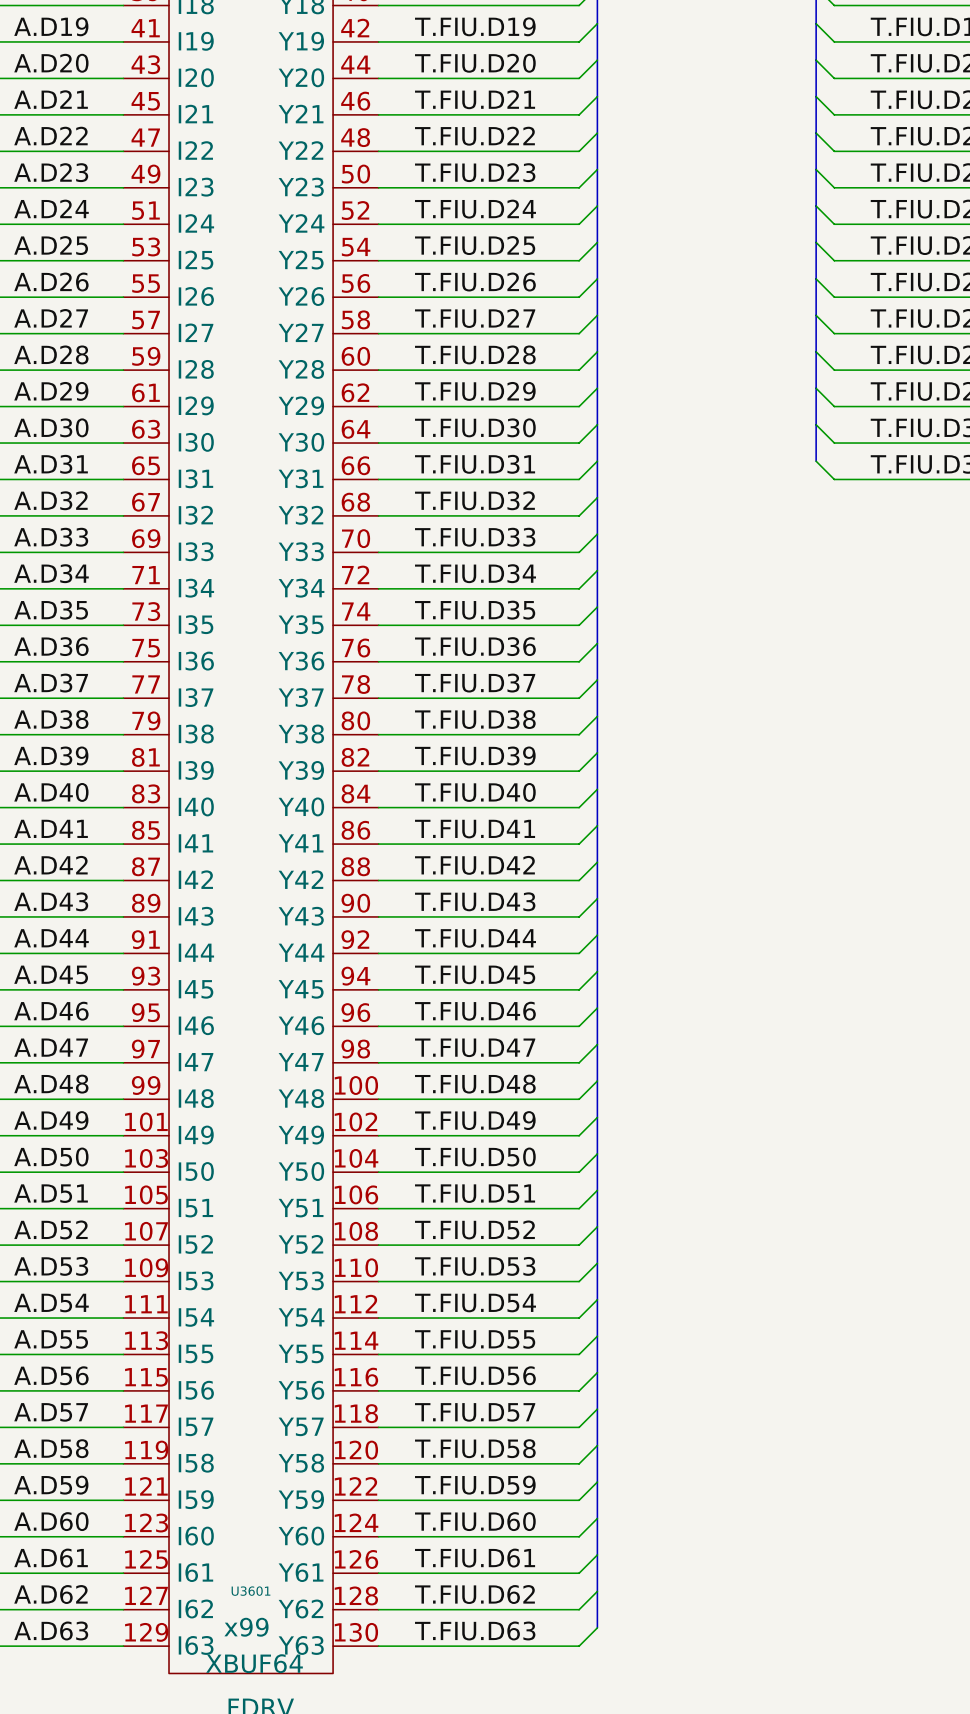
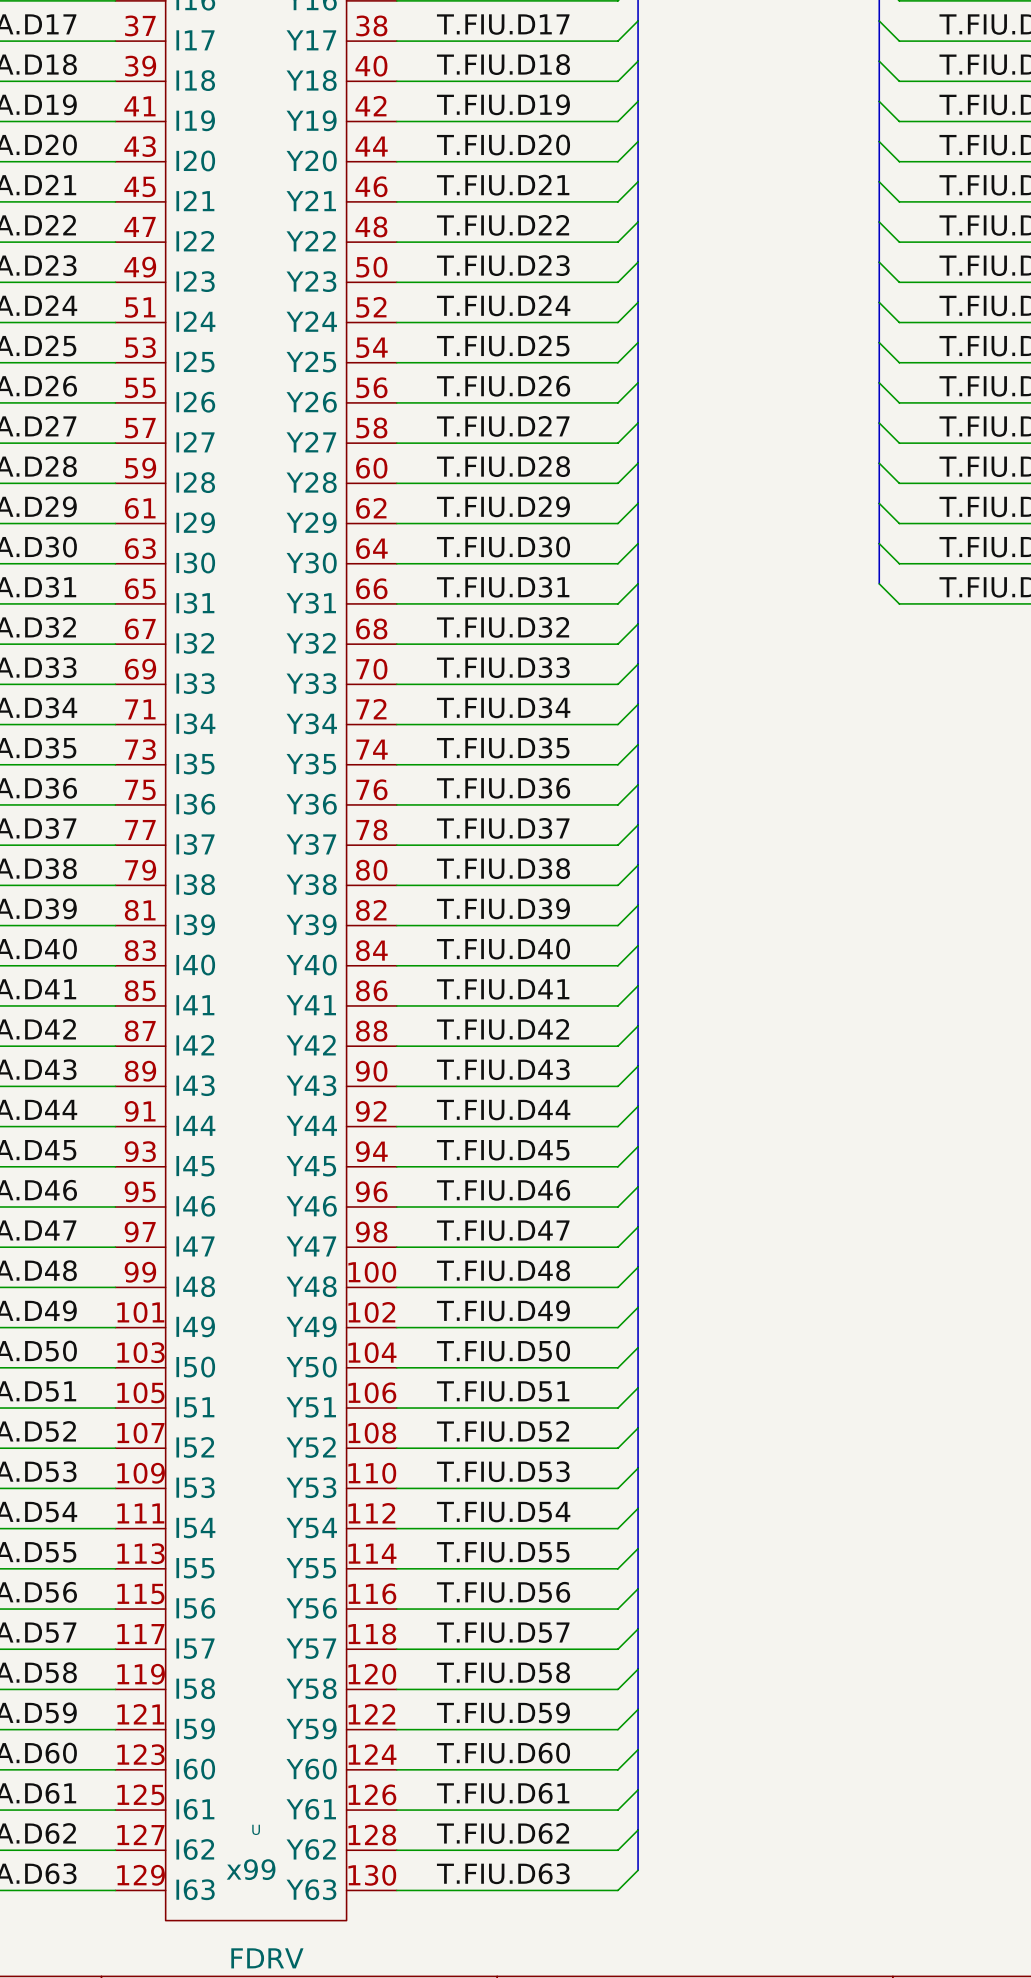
U3601 name: U3601 (251, 1591) -> U (256, 1829)
U3601 value: XBUF64 (254, 1663) -> none

